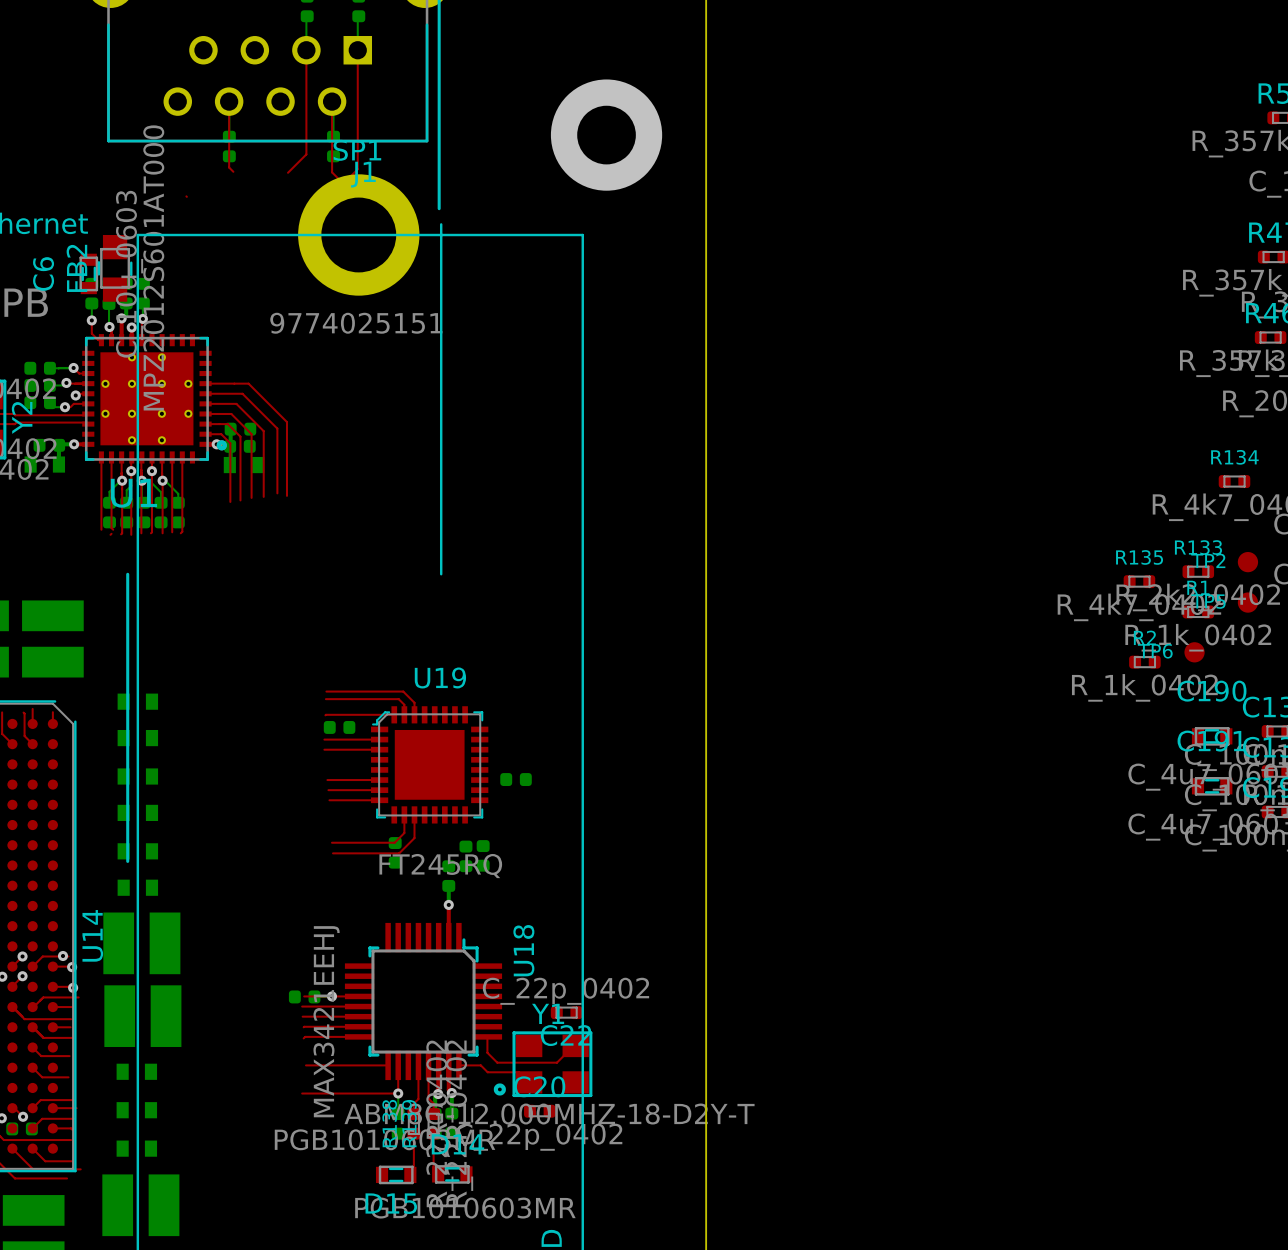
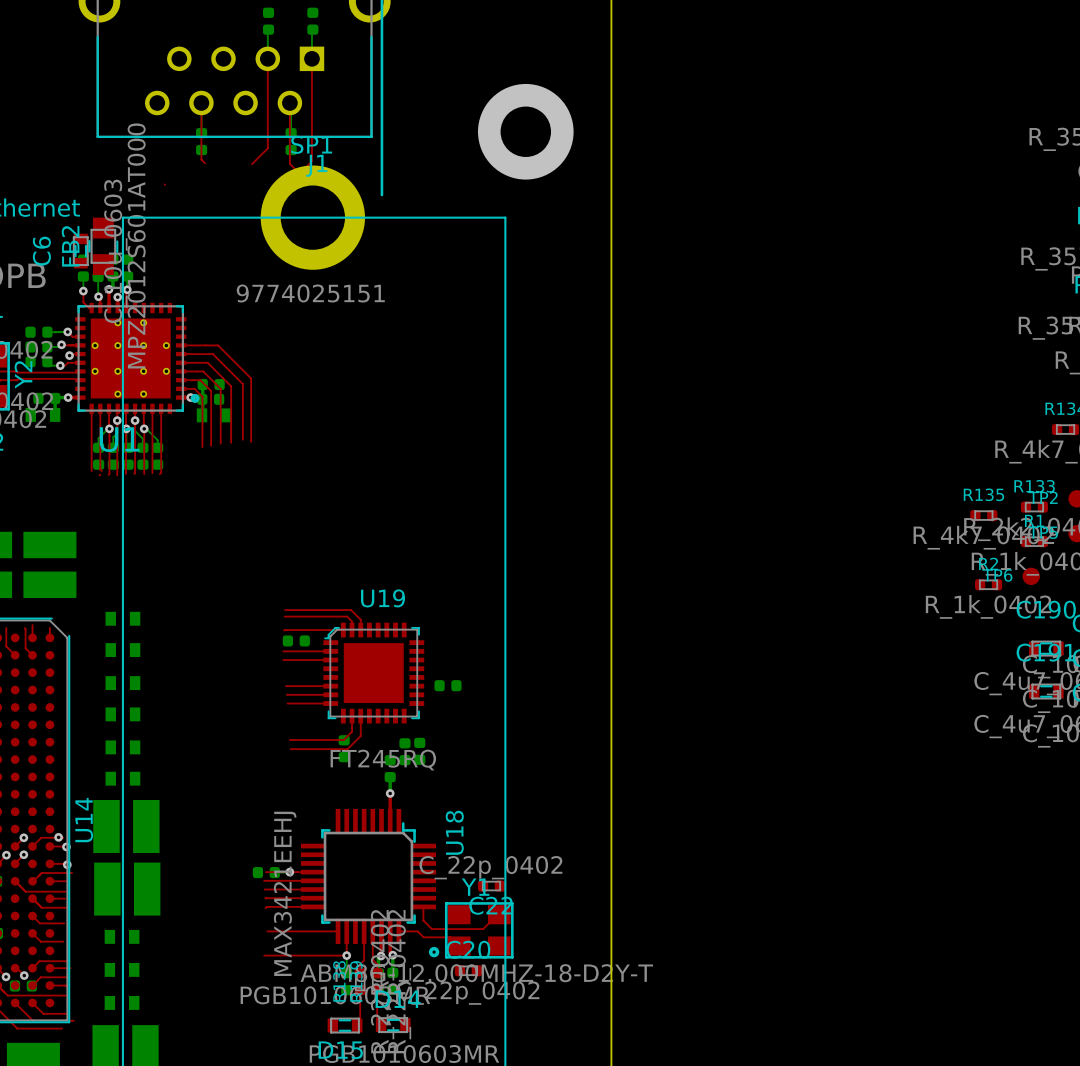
line: (441, 224) (441, 574) -> none
line: (127, 574) (127, 861) -> none

